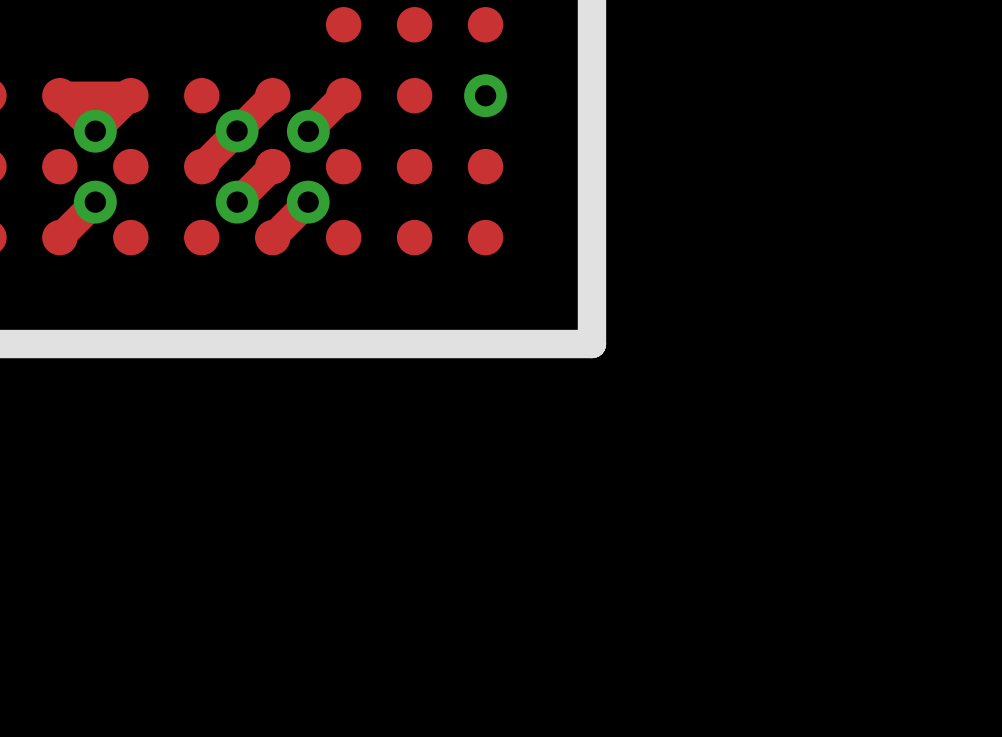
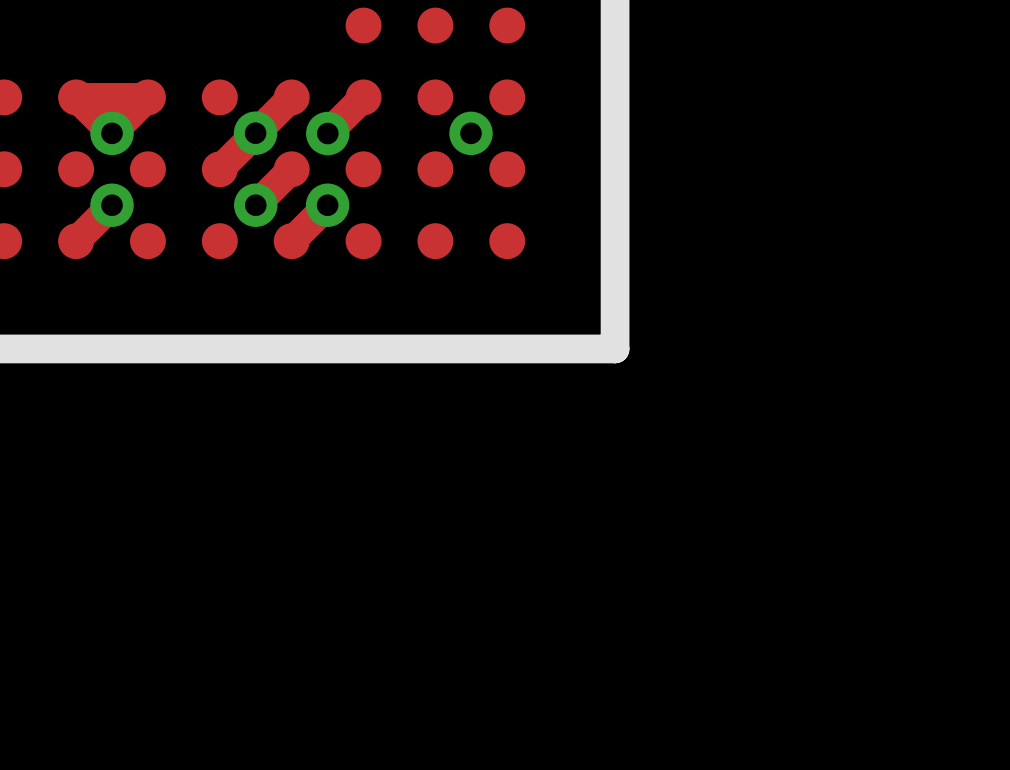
via position: (485, 95) -> (471, 133)

